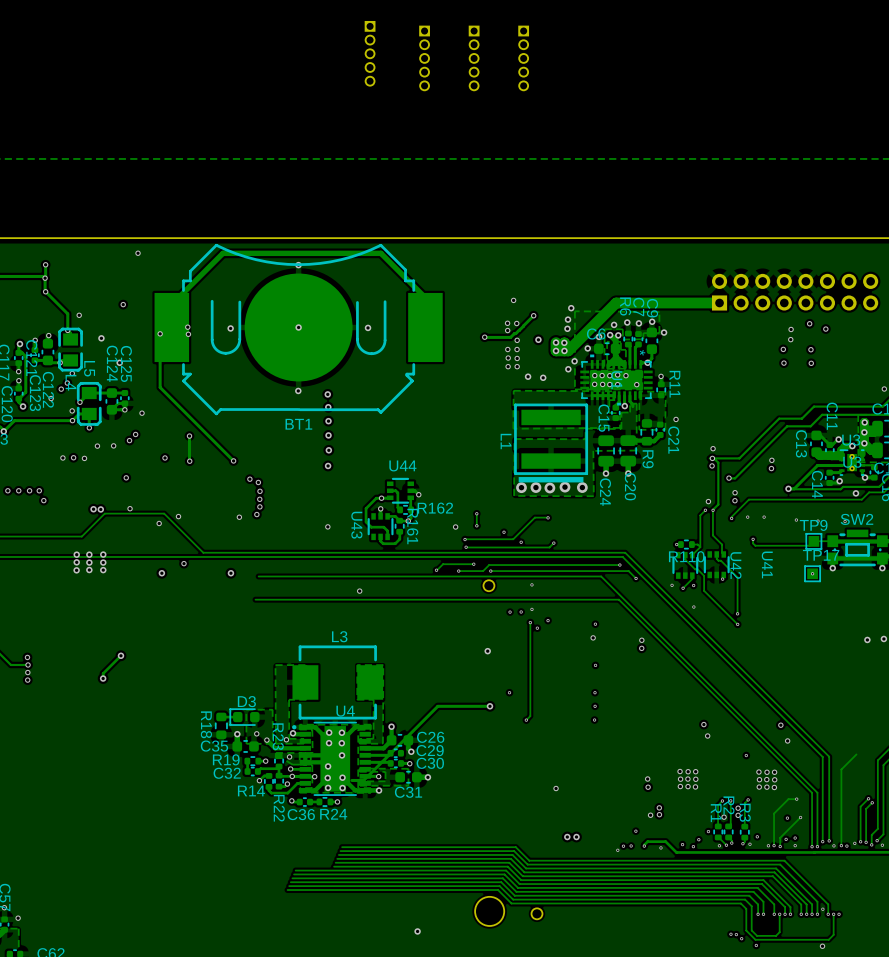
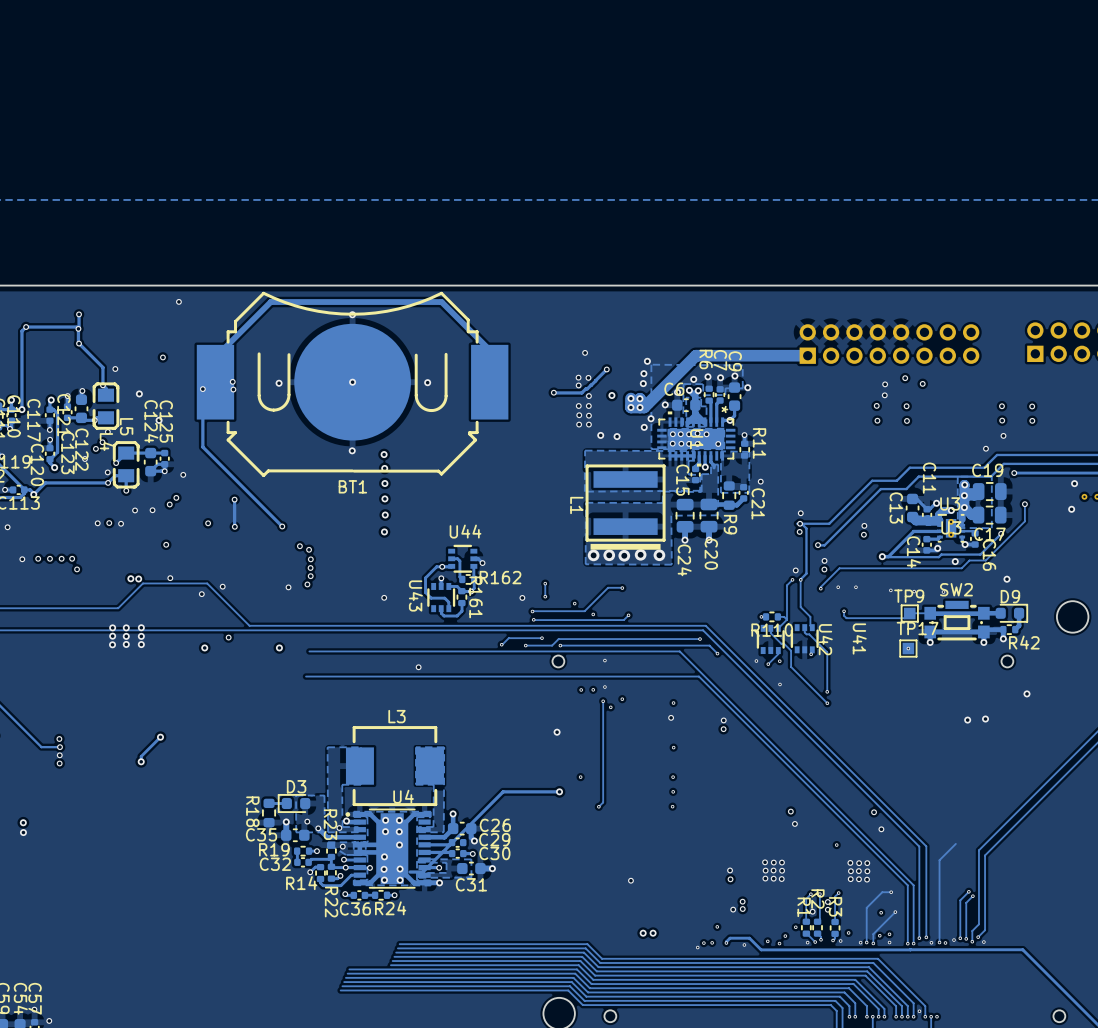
part: (370, 53) -> none
part: (424, 58) -> none
part: (474, 58) -> none
part: (523, 58) -> none

